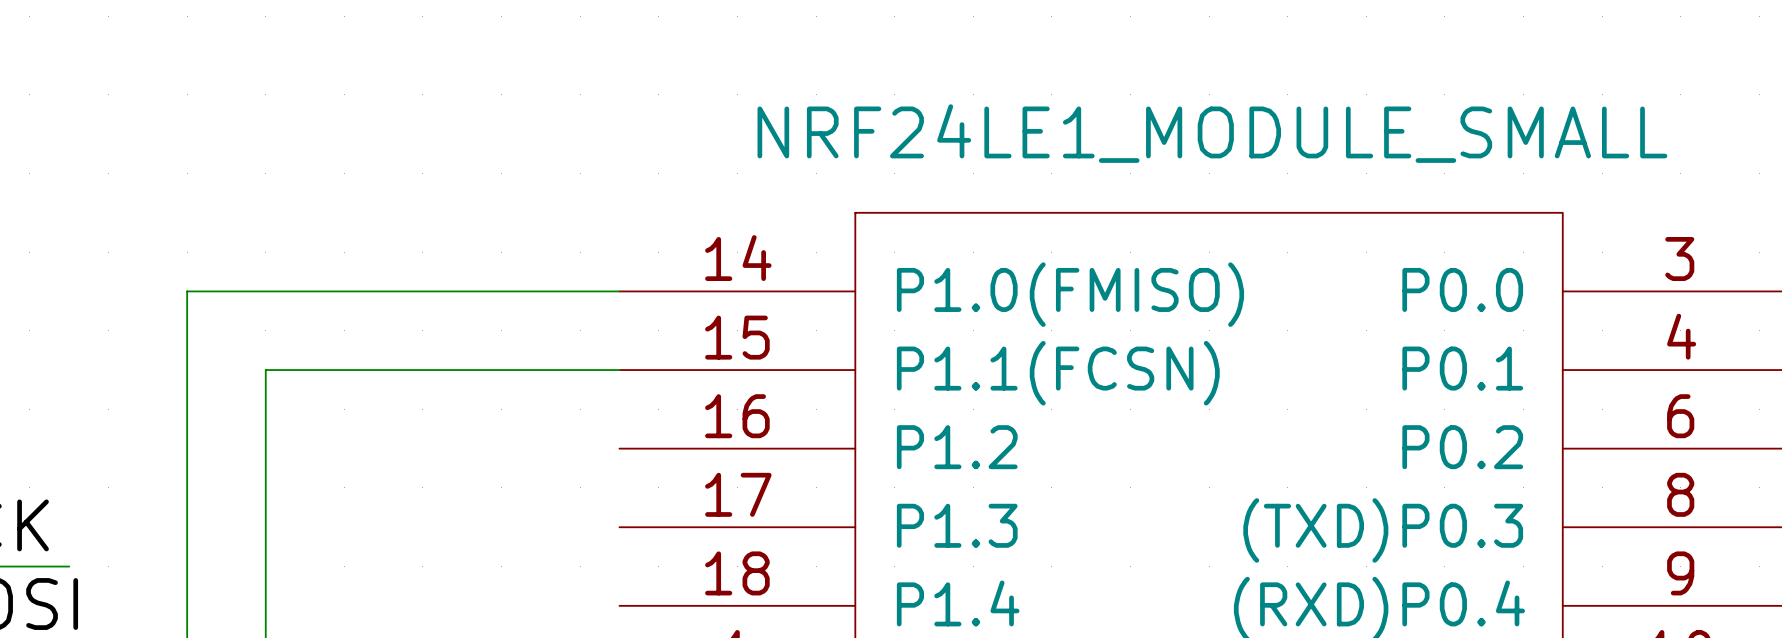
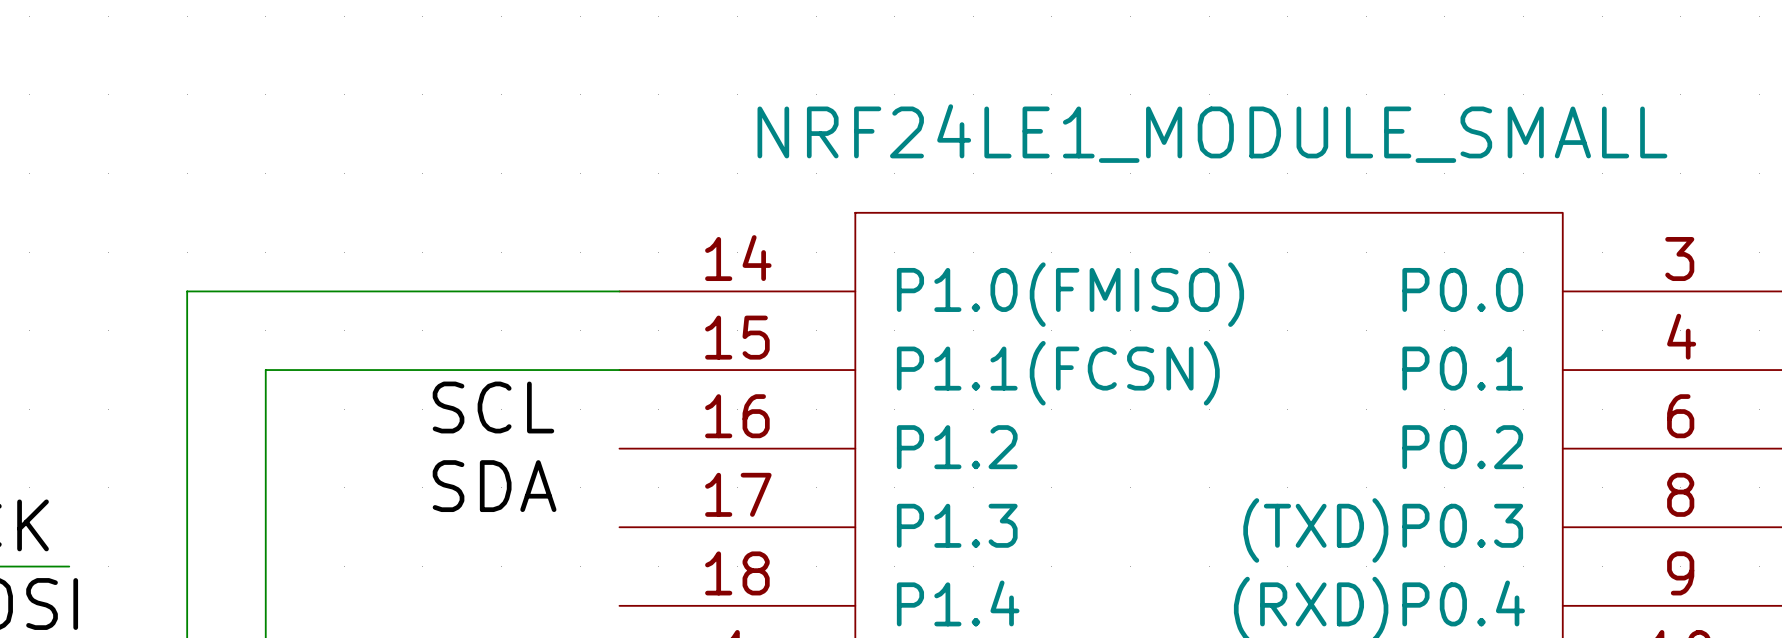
label: none -> SCL (493, 407)
label: none -> SDA (494, 486)

